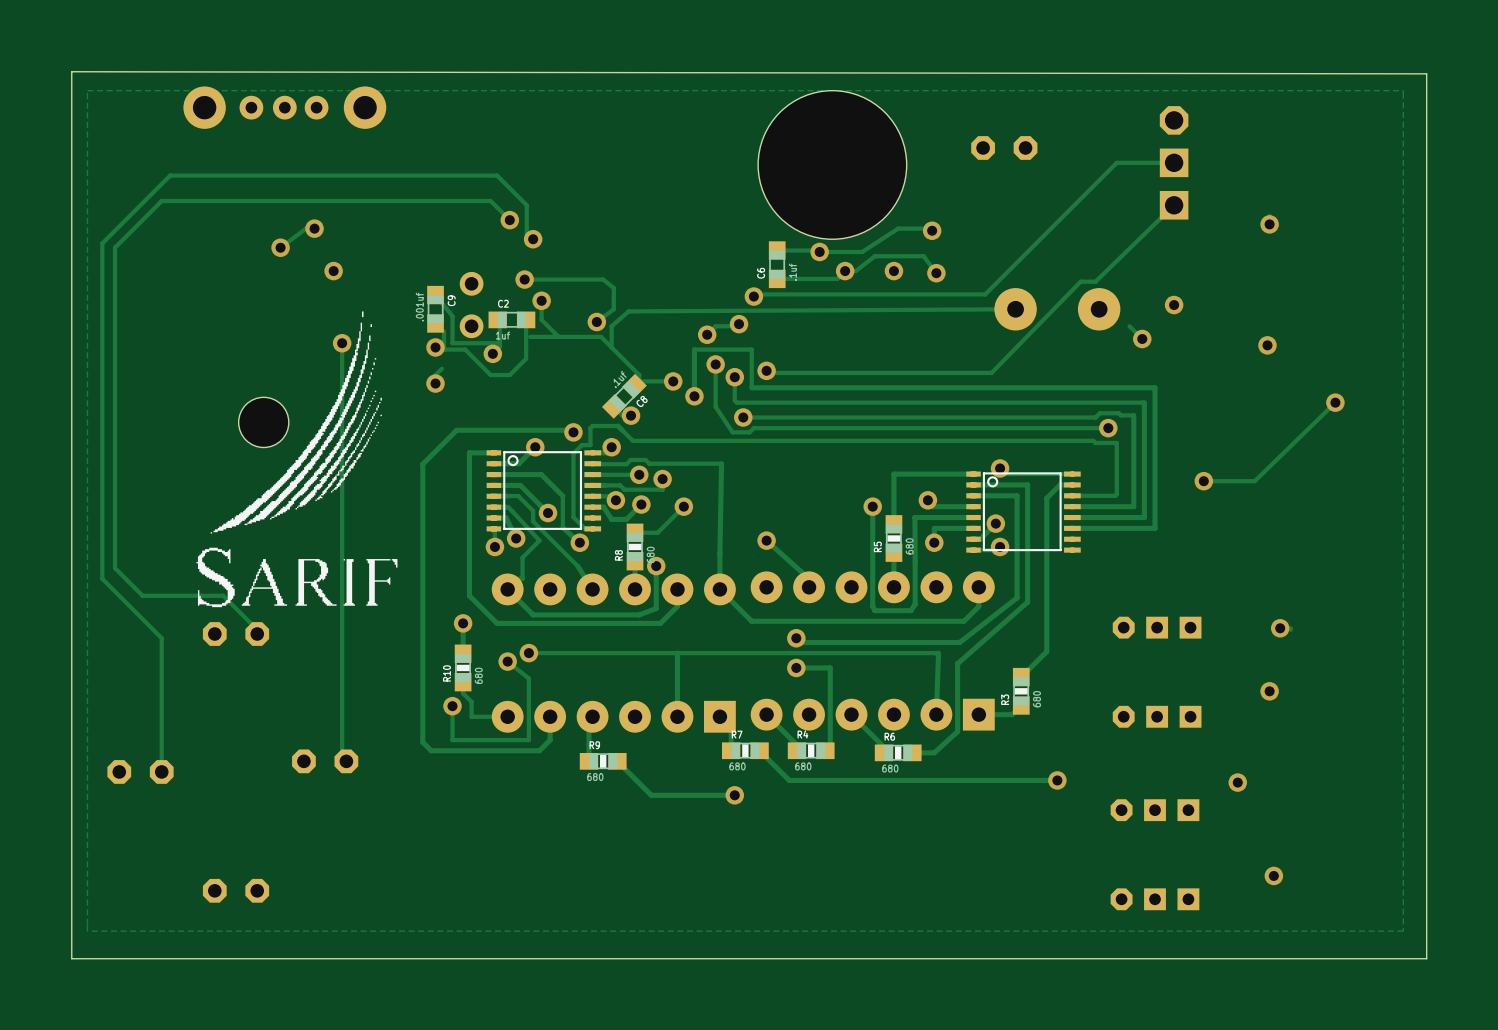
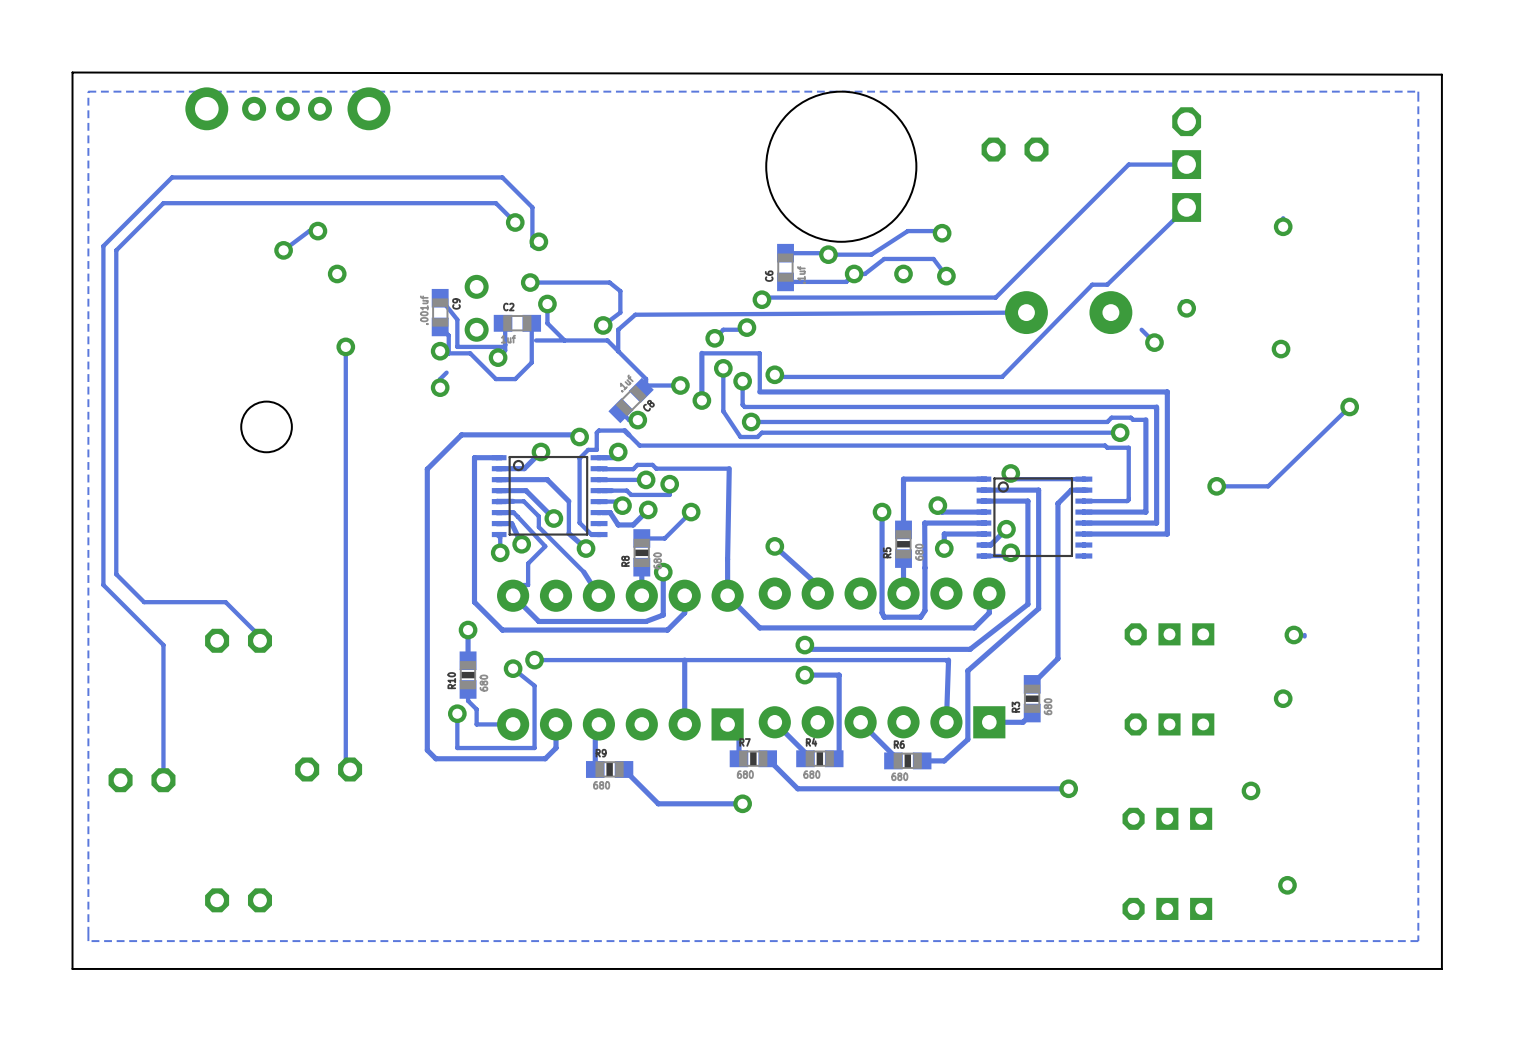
drawing: [196, 311, 398, 608] -> none

